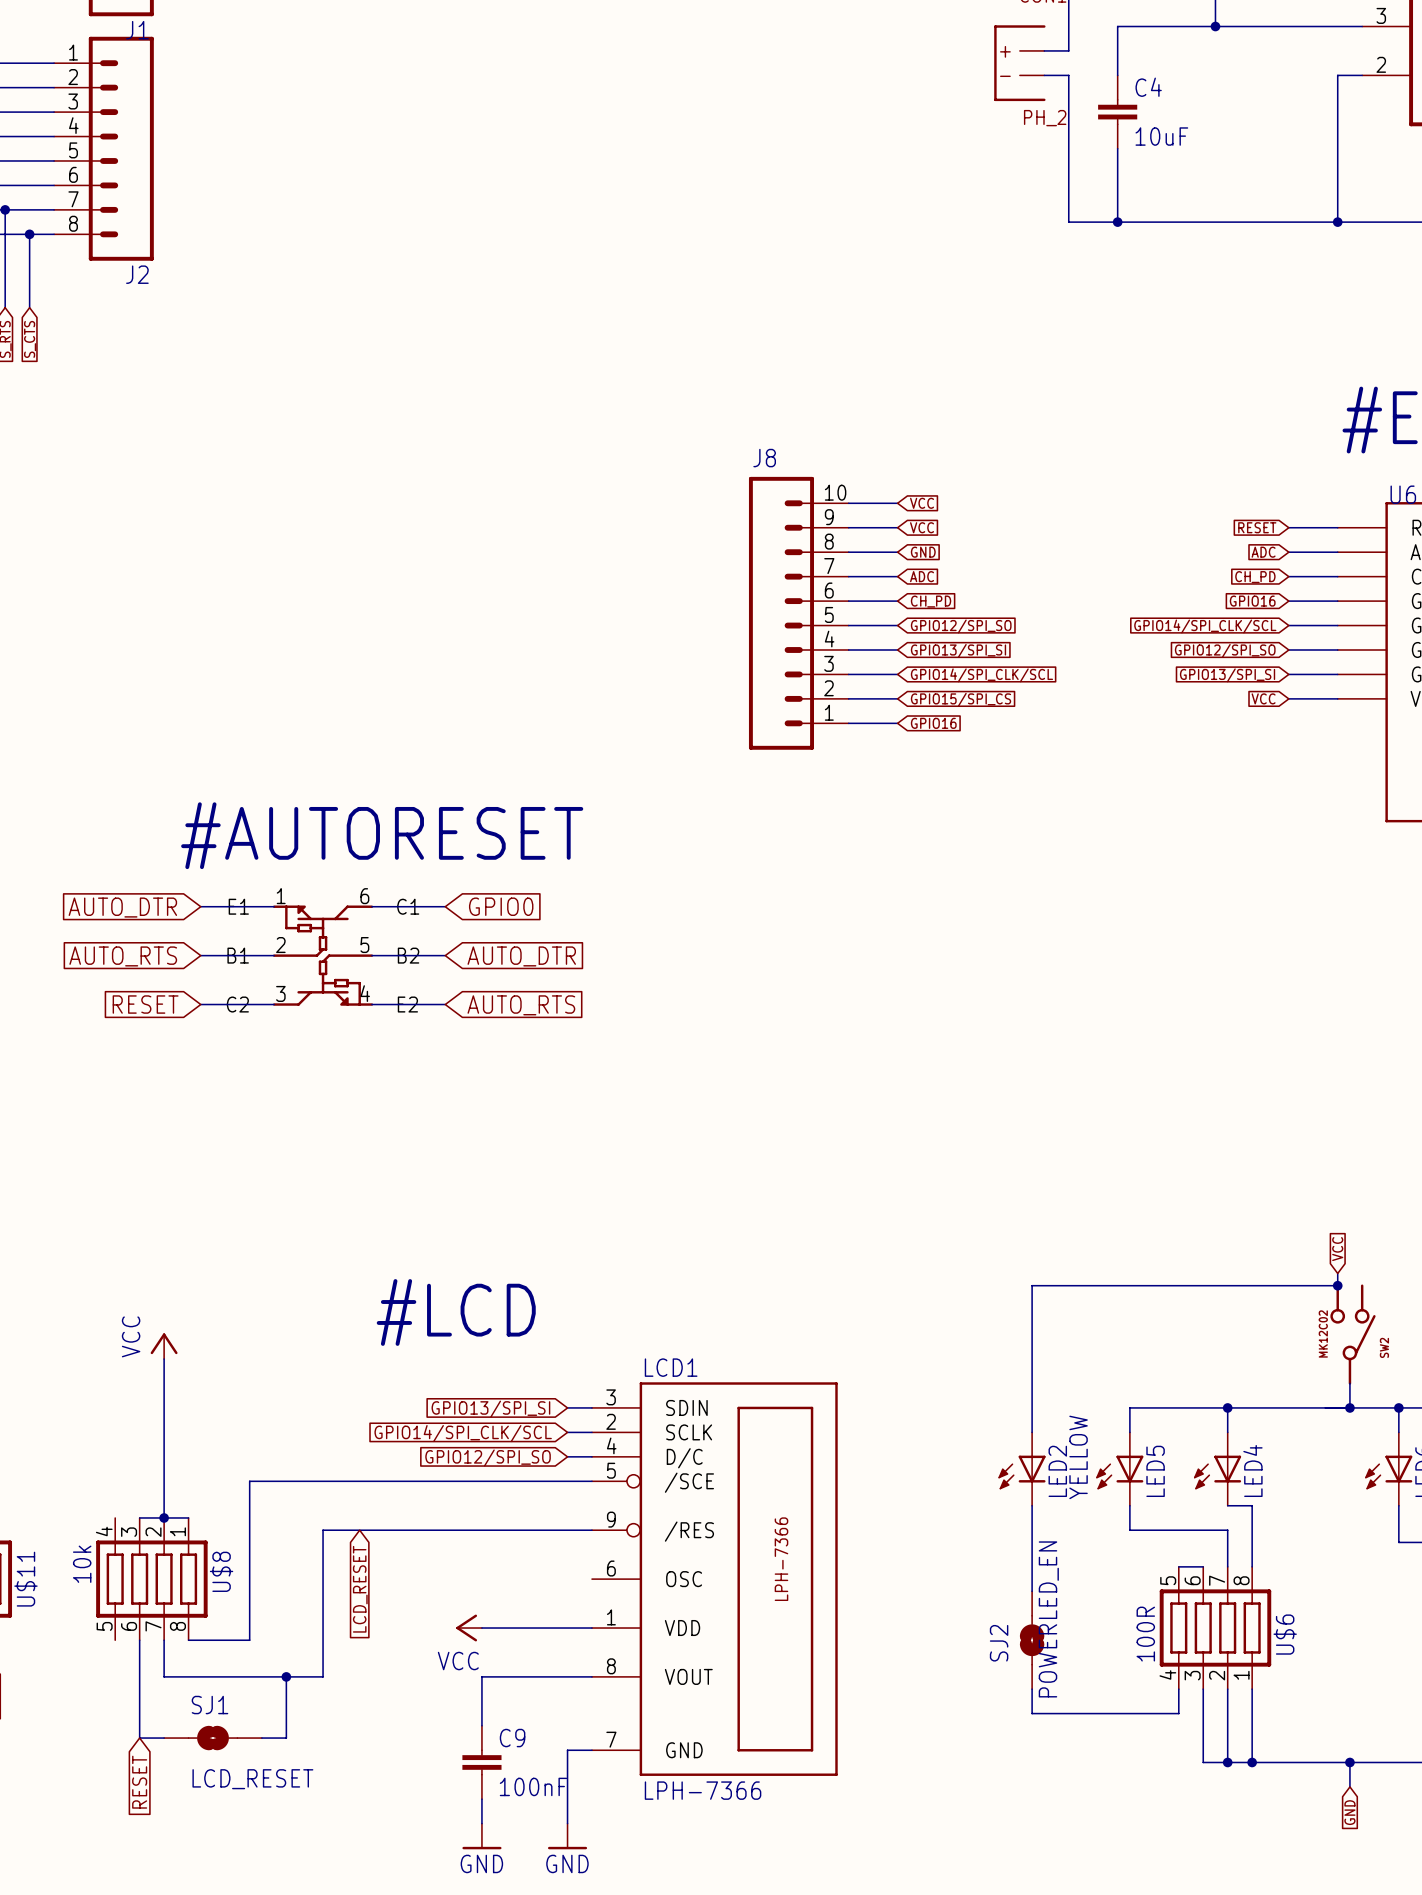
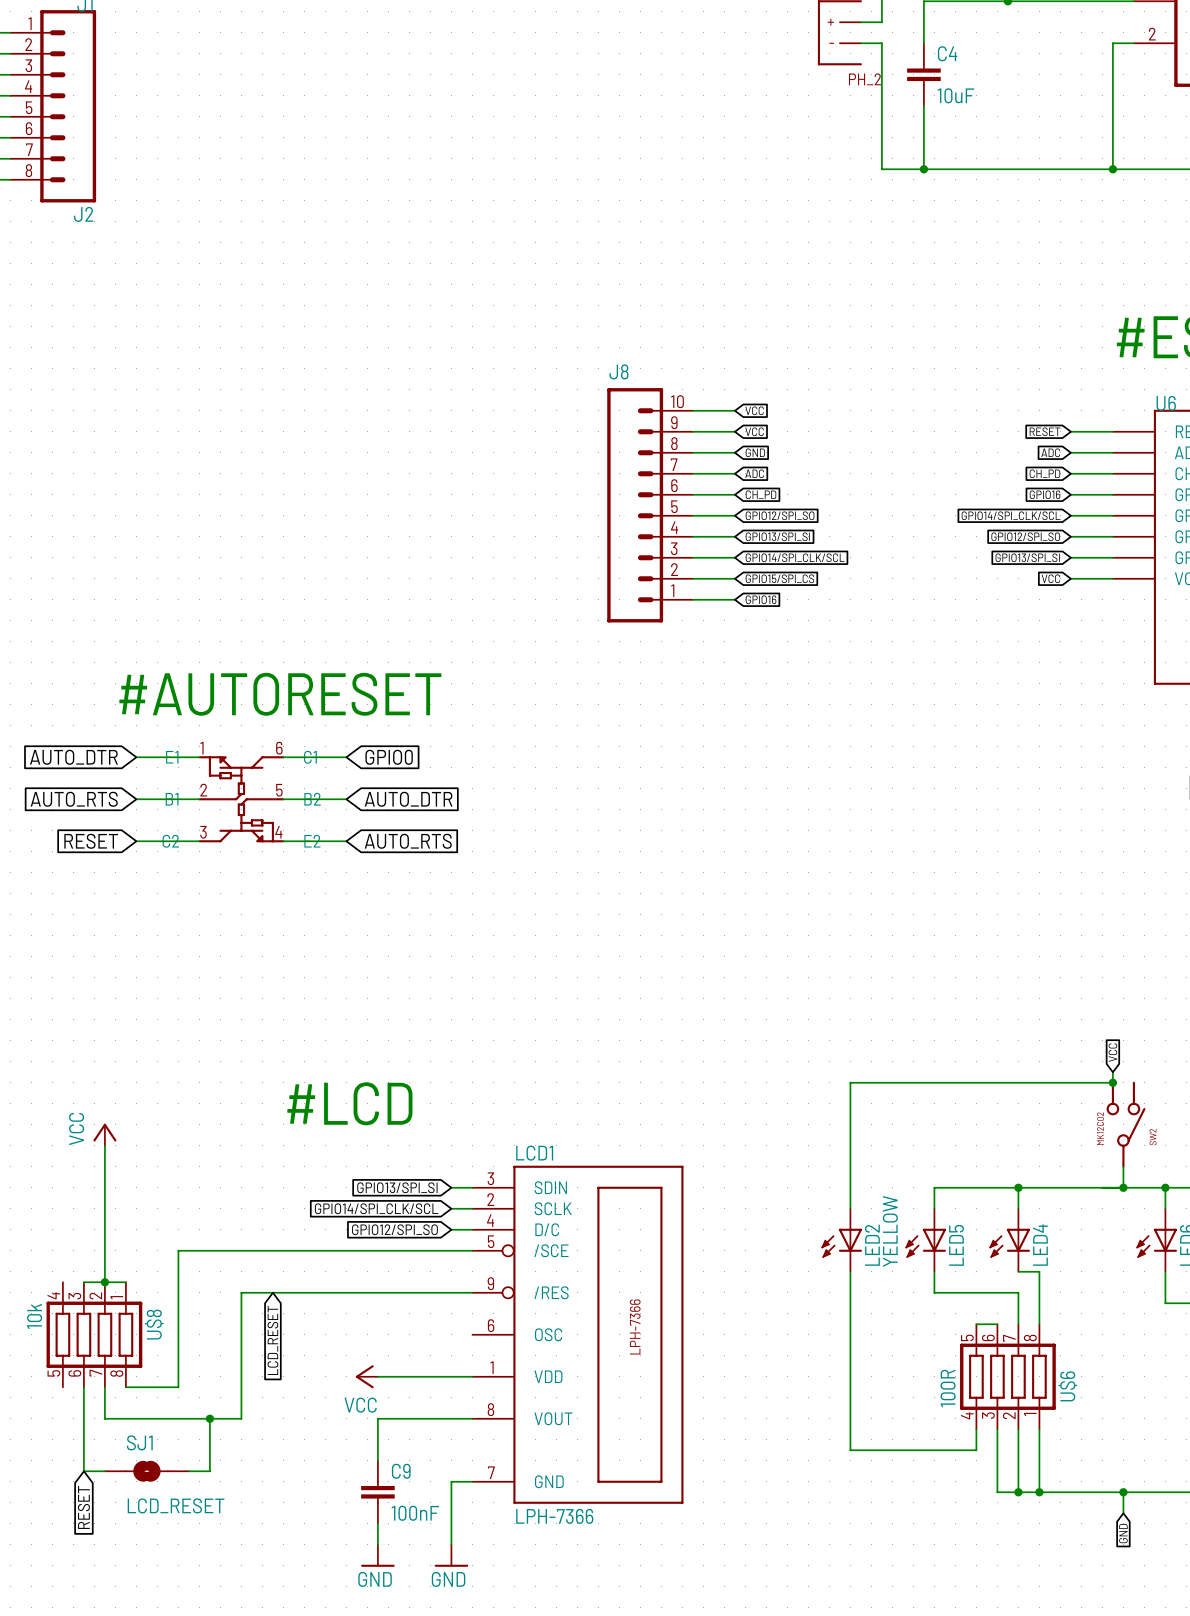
SJ2: POWERLED_EN (1032, 1640) -> none

